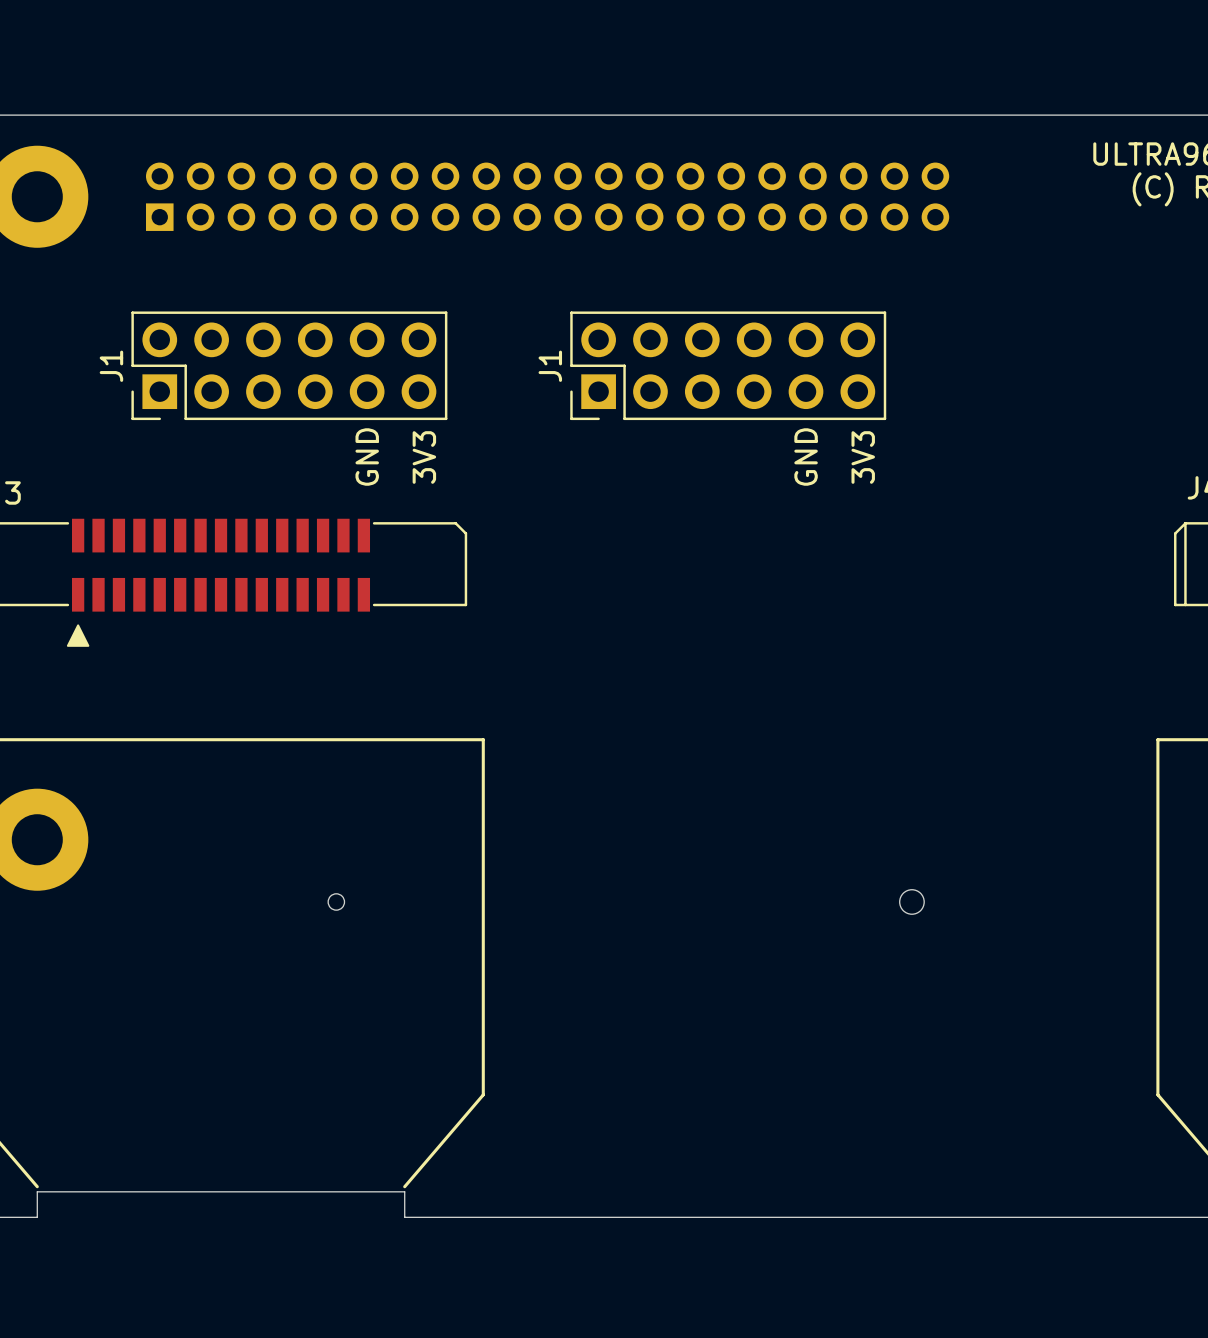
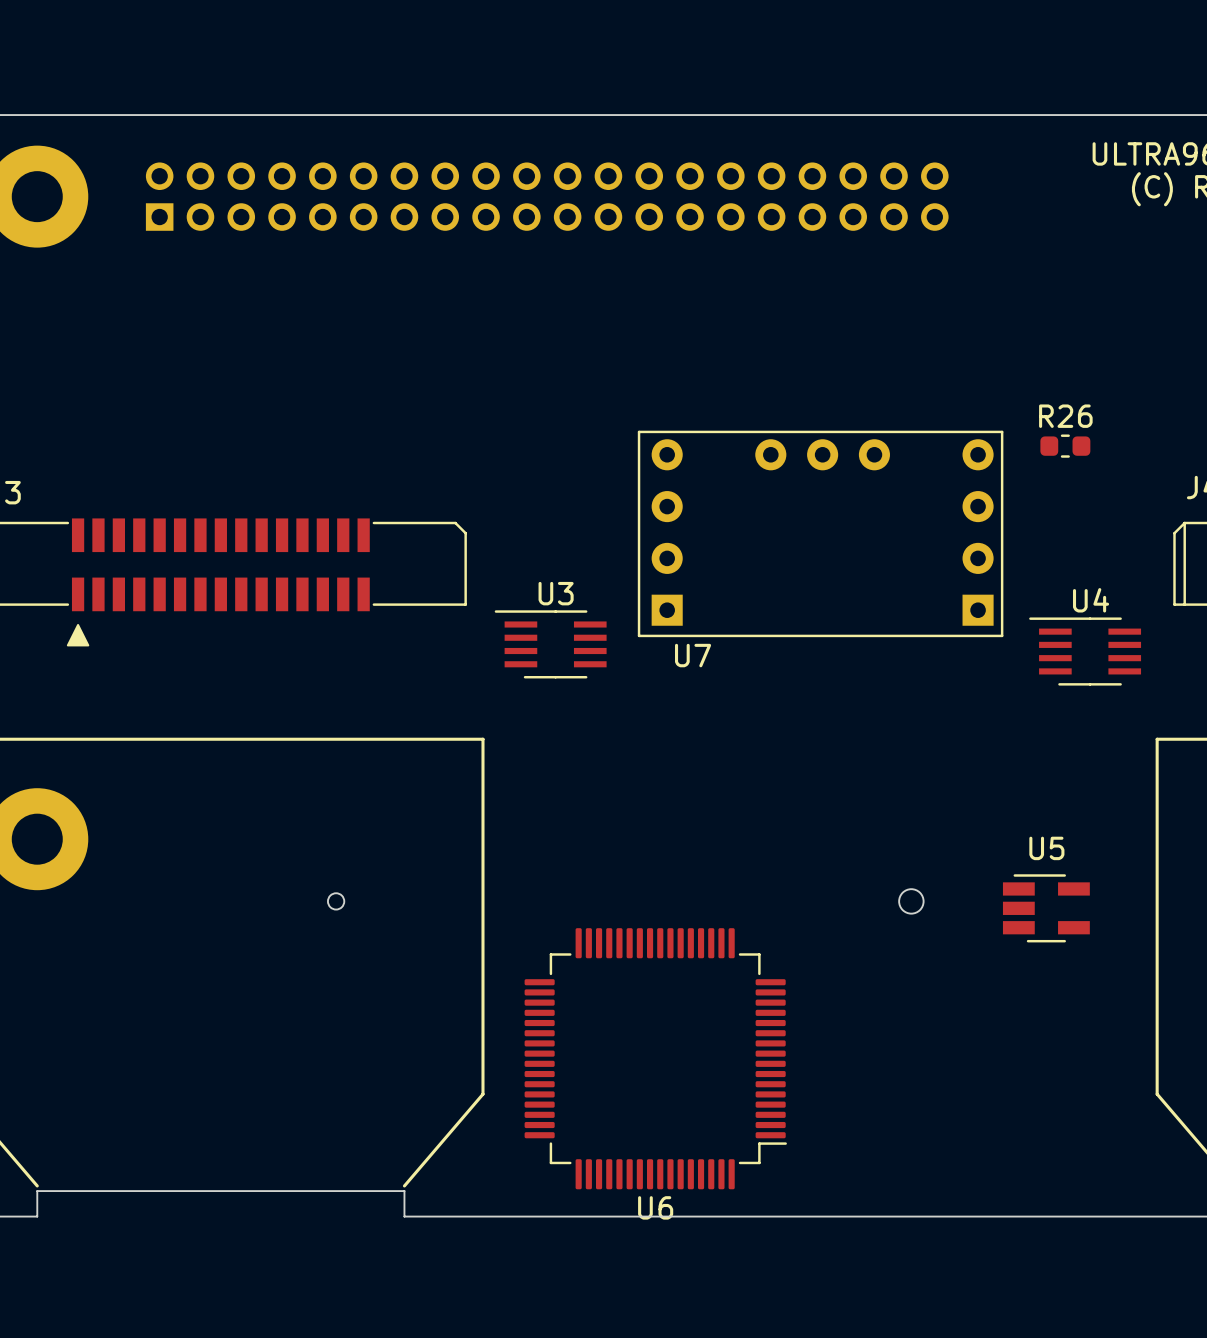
J1: (289, 365) -> none
J1: (728, 365) -> none
R26: none -> (1065, 446)
U7: none -> (820, 533)
U3: none -> (550, 644)
U4: none -> (1085, 651)
U5: none -> (1046, 908)
U6: none -> (655, 1058)

